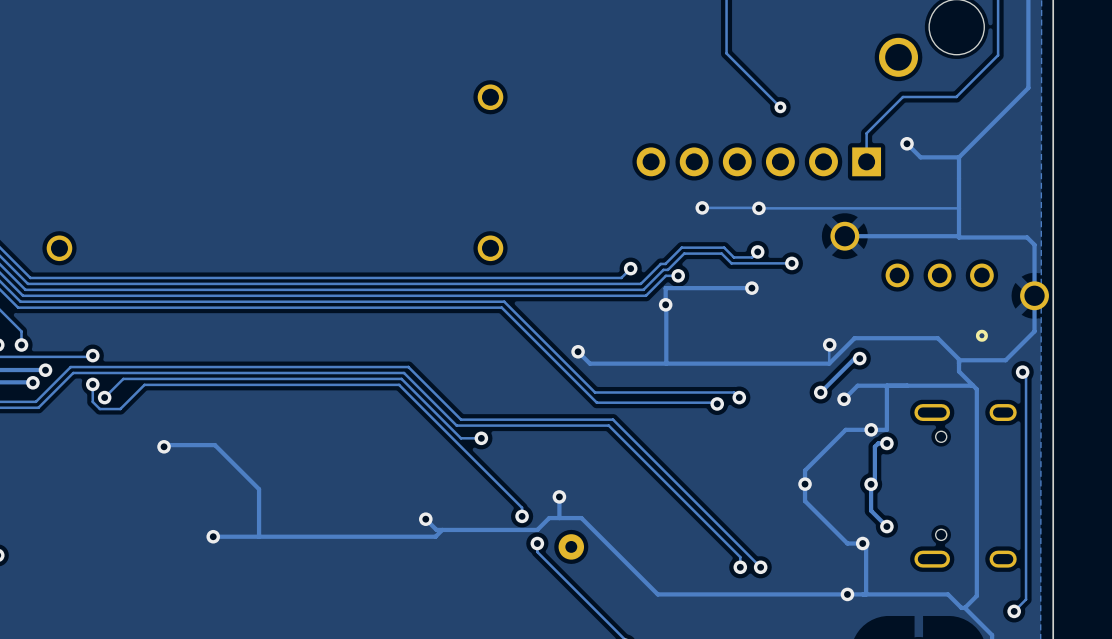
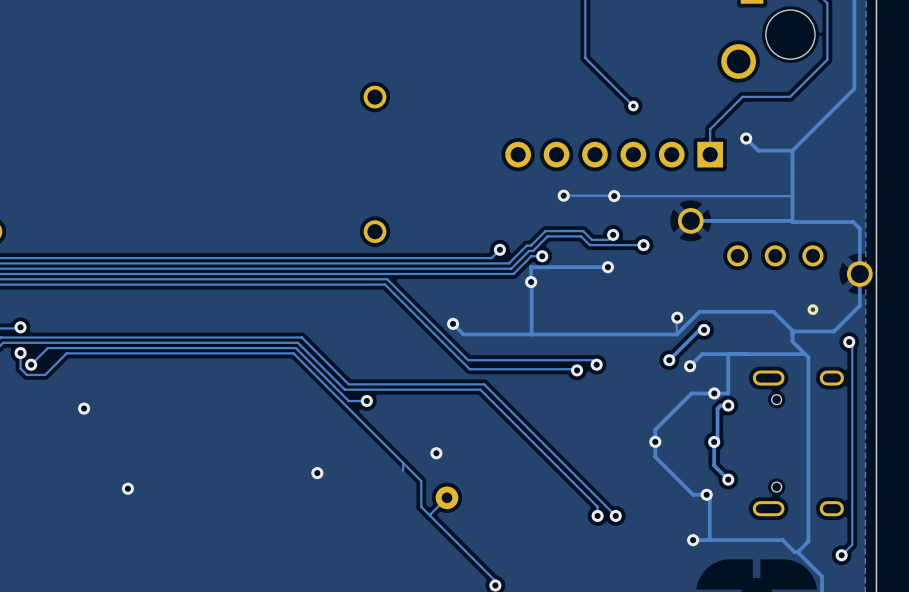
track: (164, 446) (165, 445) (214, 445) (259, 489) (259, 536) -> none
track: (559, 496) (559, 518) -> none
via: (522, 516) -> none
track: (425, 519) (436, 529) (537, 529) (549, 518) (581, 518) (657, 594) (847, 594) -> none
track: (442, 529) (435, 536) (213, 536) -> none
track: (537, 543) (537, 552) (542, 557) -> (403, 462) (421, 481) (421, 506)
via: (537, 543) -> none
track: none -> (447, 497) (430, 515)

